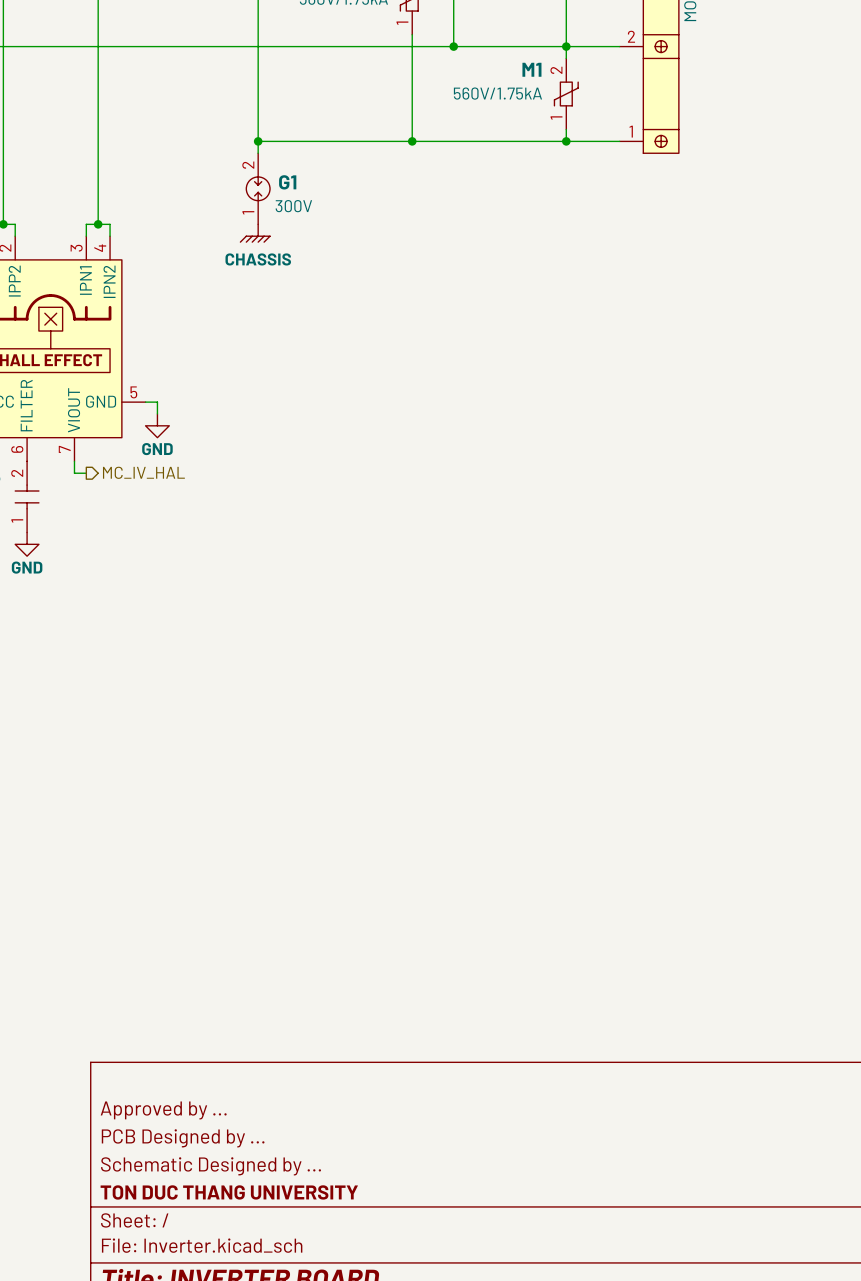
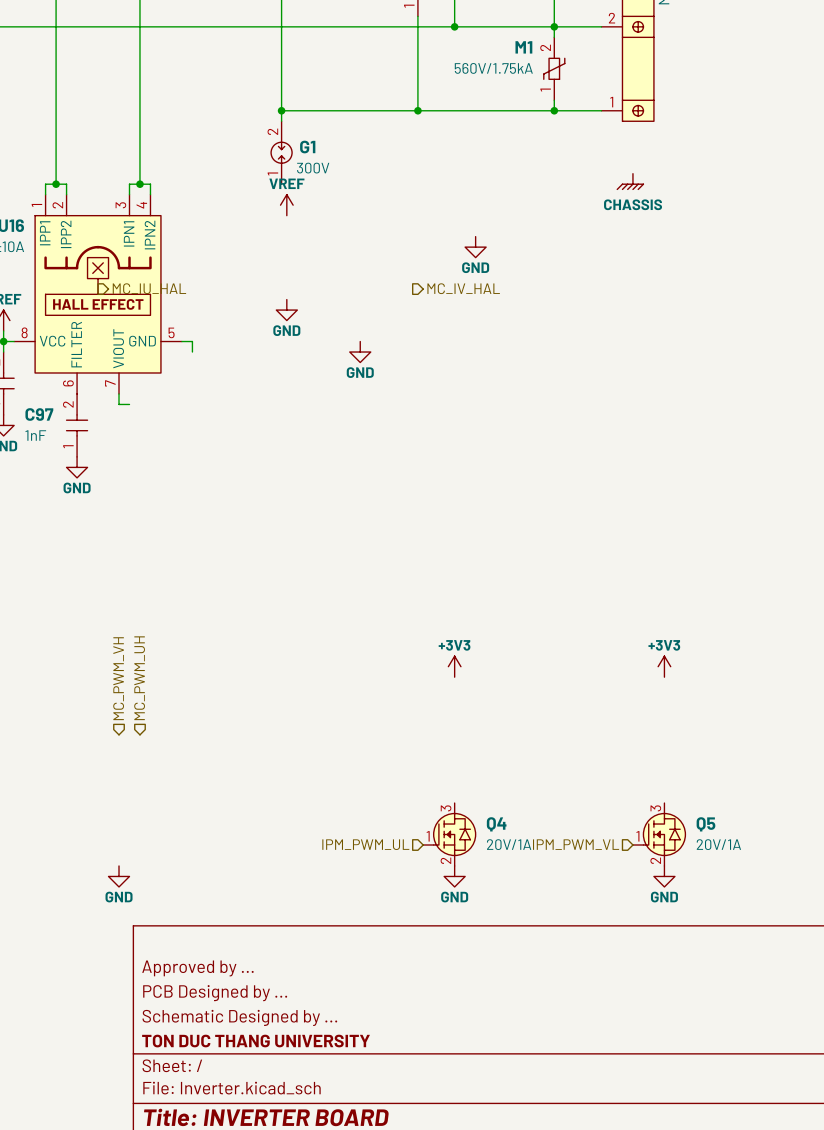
power symbol: none -> CHASSIS (630, 181)
power symbol: CHASSIS (255, 233) -> none
power symbol: none -> VREF (286, 205)
power symbol: none -> GND (475, 247)
hierarchical label: none -> MC_IU_HAL (149, 288)
hierarchical label: none -> MC_IV_HAL (463, 288)
power symbol: none -> GND (286, 310)
power symbol: none -> GND (360, 352)
power symbol: GND (157, 425) -> none
hierarchical label: MC_IV_HAL (143, 472) -> none
power symbol: none -> +3V3 (454, 666)
power symbol: none -> +3V3 (664, 666)
hierarchical label: none -> MC_PWM_UH (139, 678)
hierarchical label: none -> MC_PWM_VH (118, 678)
Q4: none -> 20V/1A (449, 834)
Q5: none -> 20V/1A (659, 834)
hierarchical label: none -> IPM_PWM_UL (365, 844)
hierarchical label: none -> IPM_PWM_VL (576, 844)
power symbol: none -> GND (119, 876)
power symbol: none -> GND (454, 876)
power symbol: none -> GND (664, 876)

